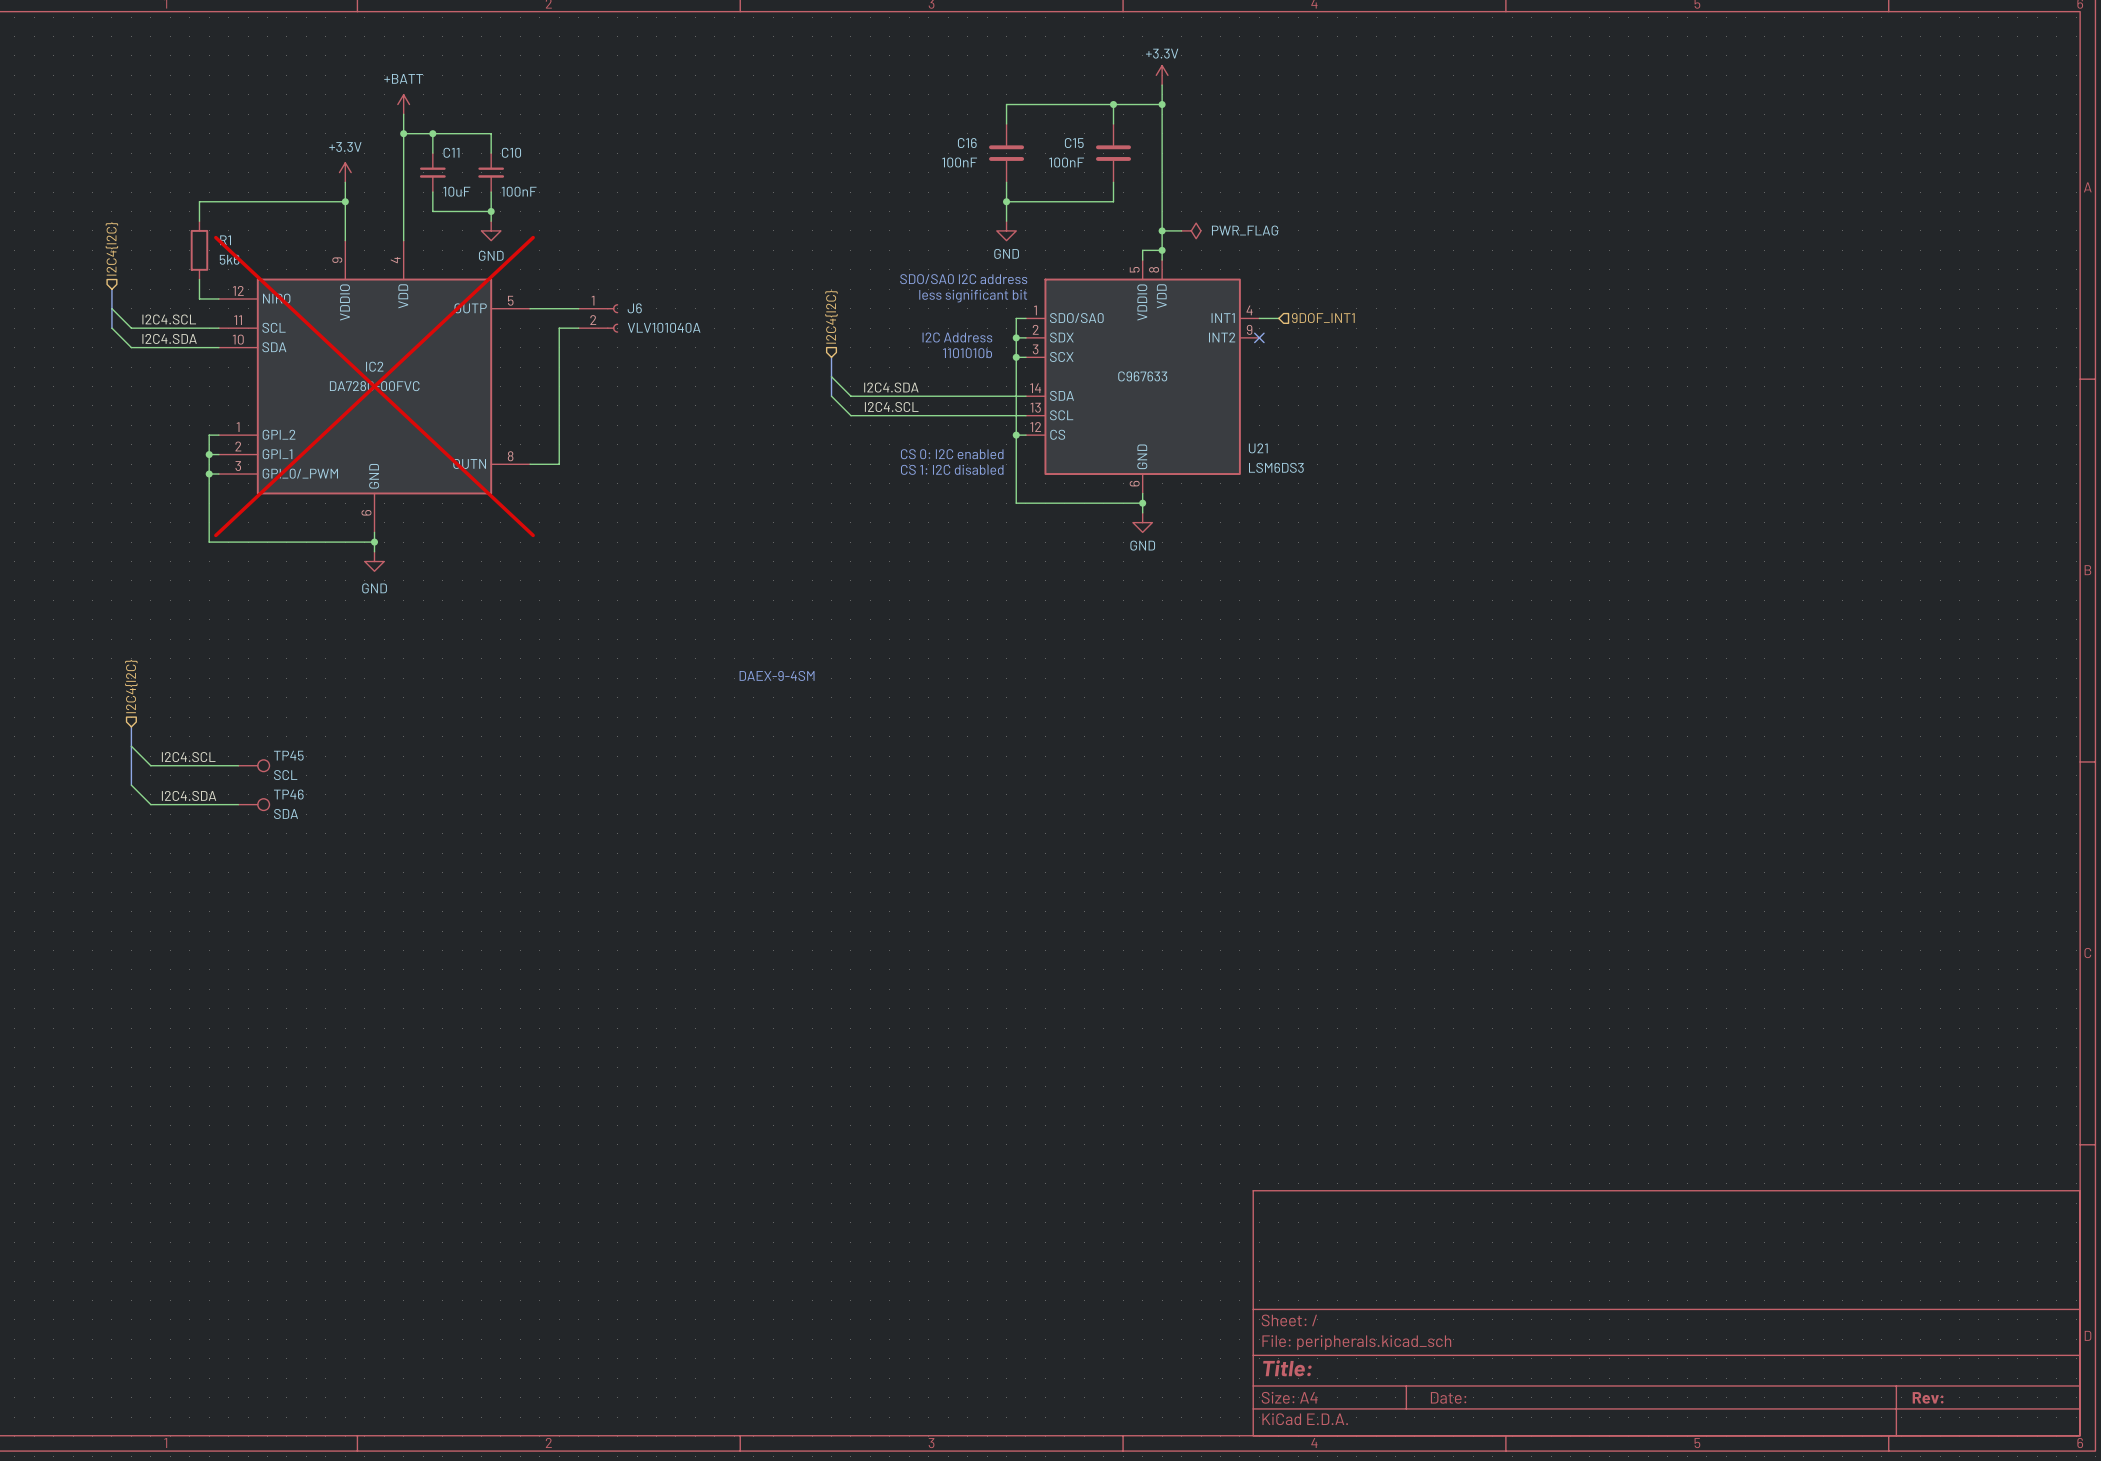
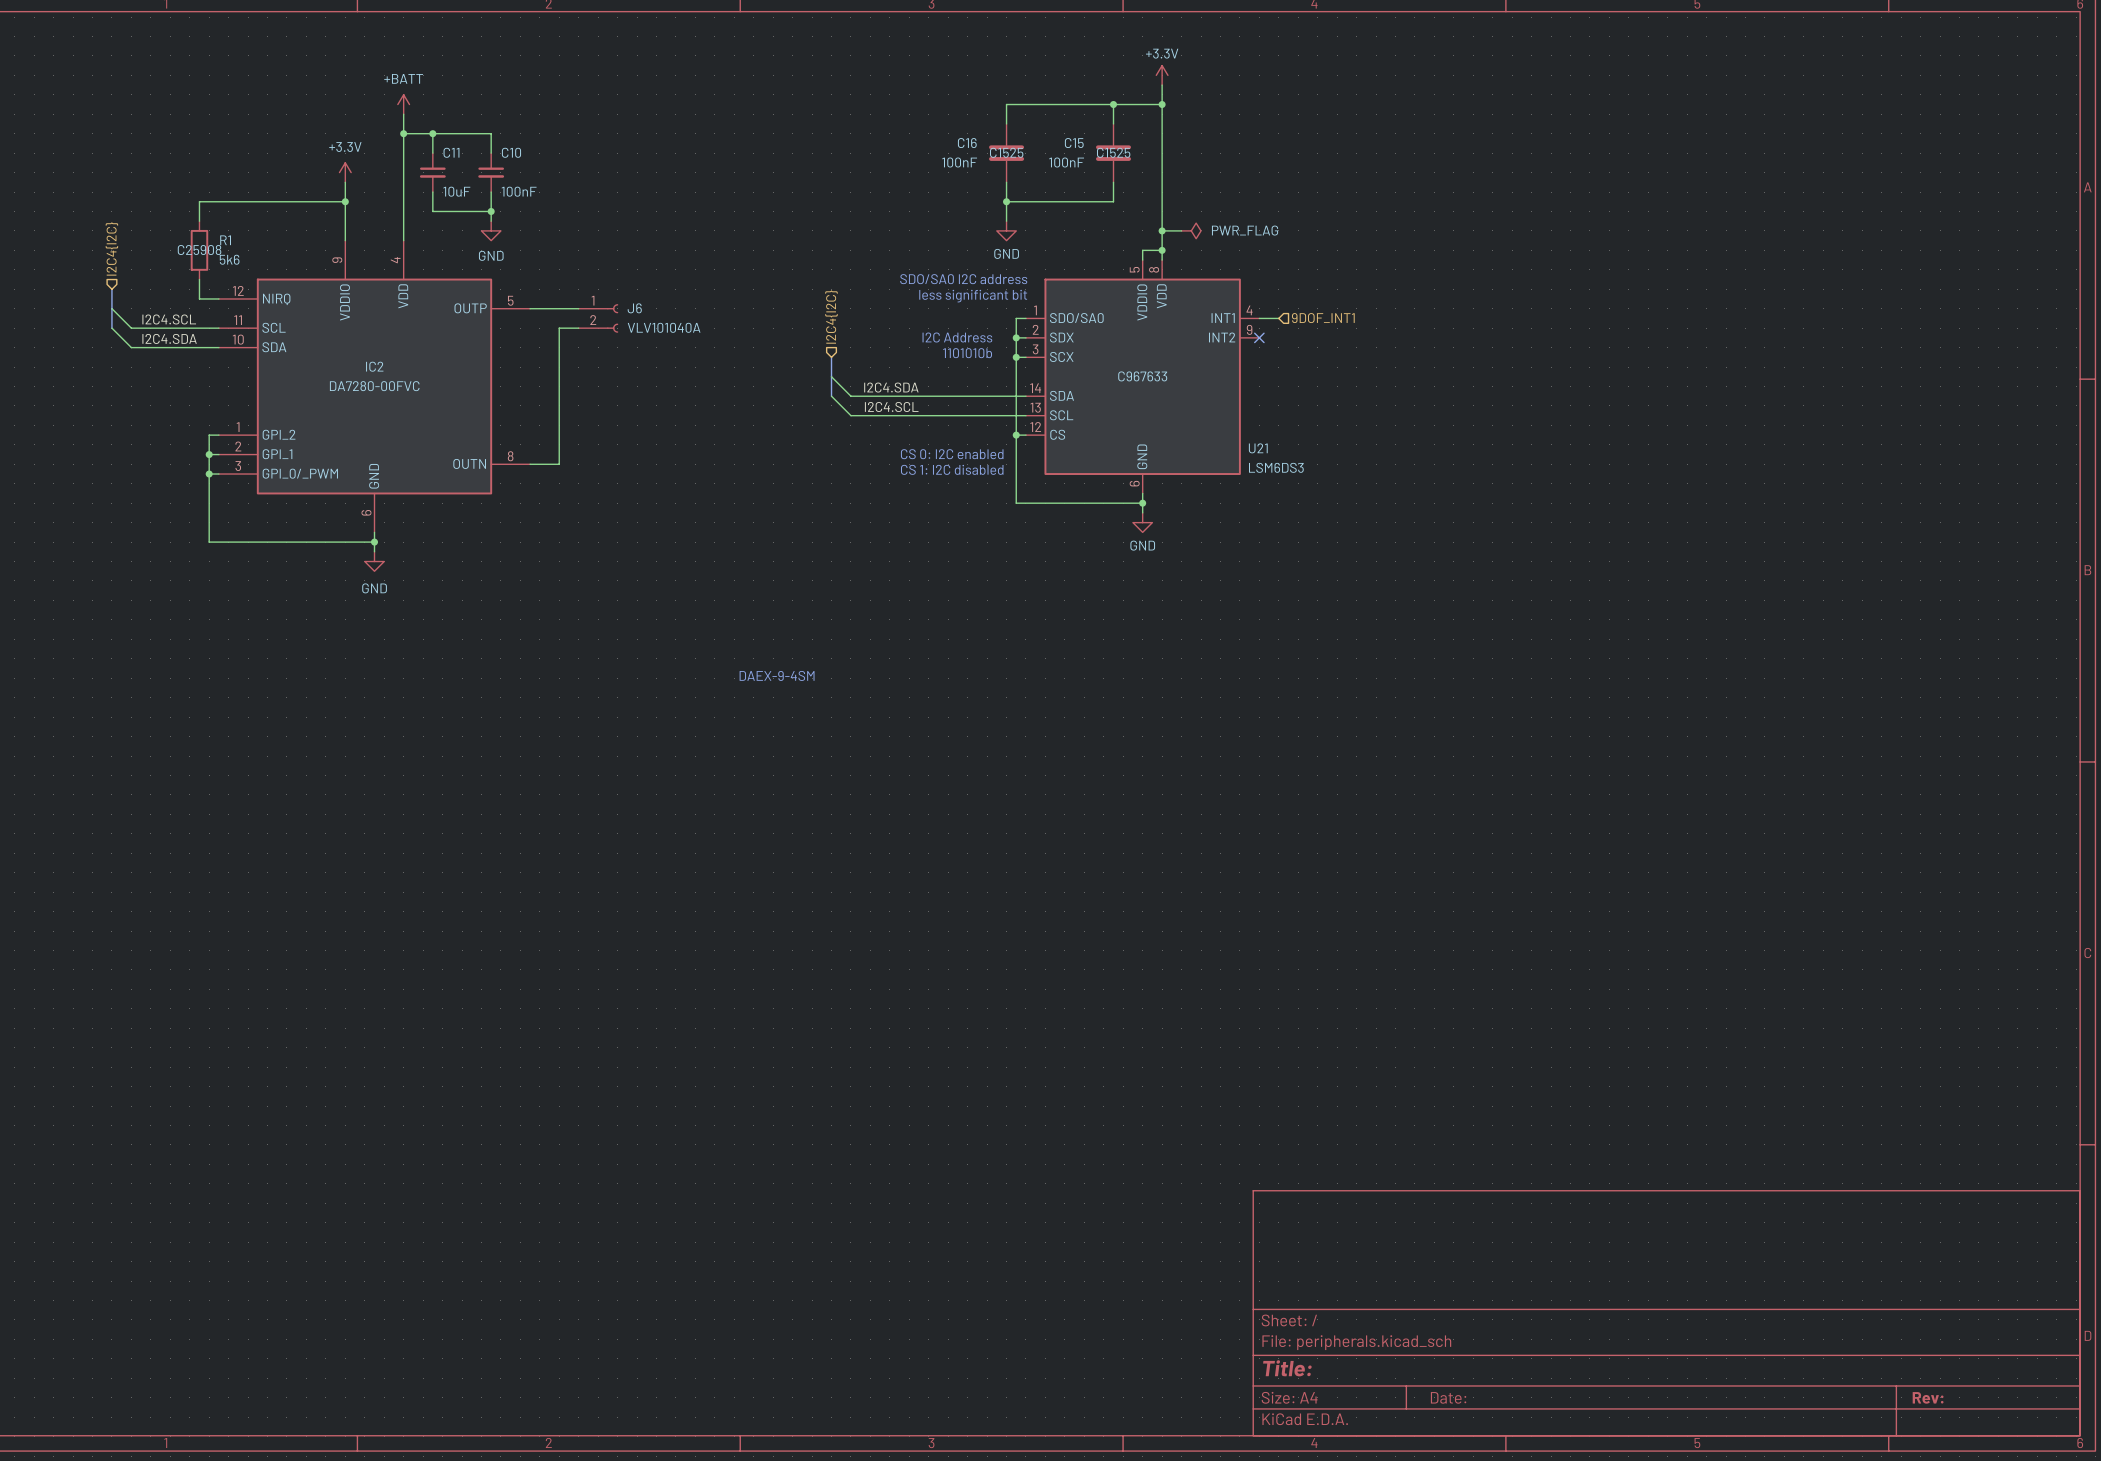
C16 text: none -> C1525 (1006, 152)
C15 text: none -> C1525 (1113, 152)
R1 text: none -> C25908 (199, 250)
IC2 do-not-place cross: (374, 386) -> none
hierarchical label: I2C4{I2C} (131, 686) -> none
bus: (131, 726) (131, 785) -> none
wire: (131, 746) (150, 765) (238, 765) -> none
label: I2C4.SCL (188, 757) -> none
TP45: SCL (253, 765) -> none
wire: (131, 785) (150, 804) (238, 804) -> none
label: I2C4.SDA (189, 795) -> none
TP46: SDA (253, 804) -> none

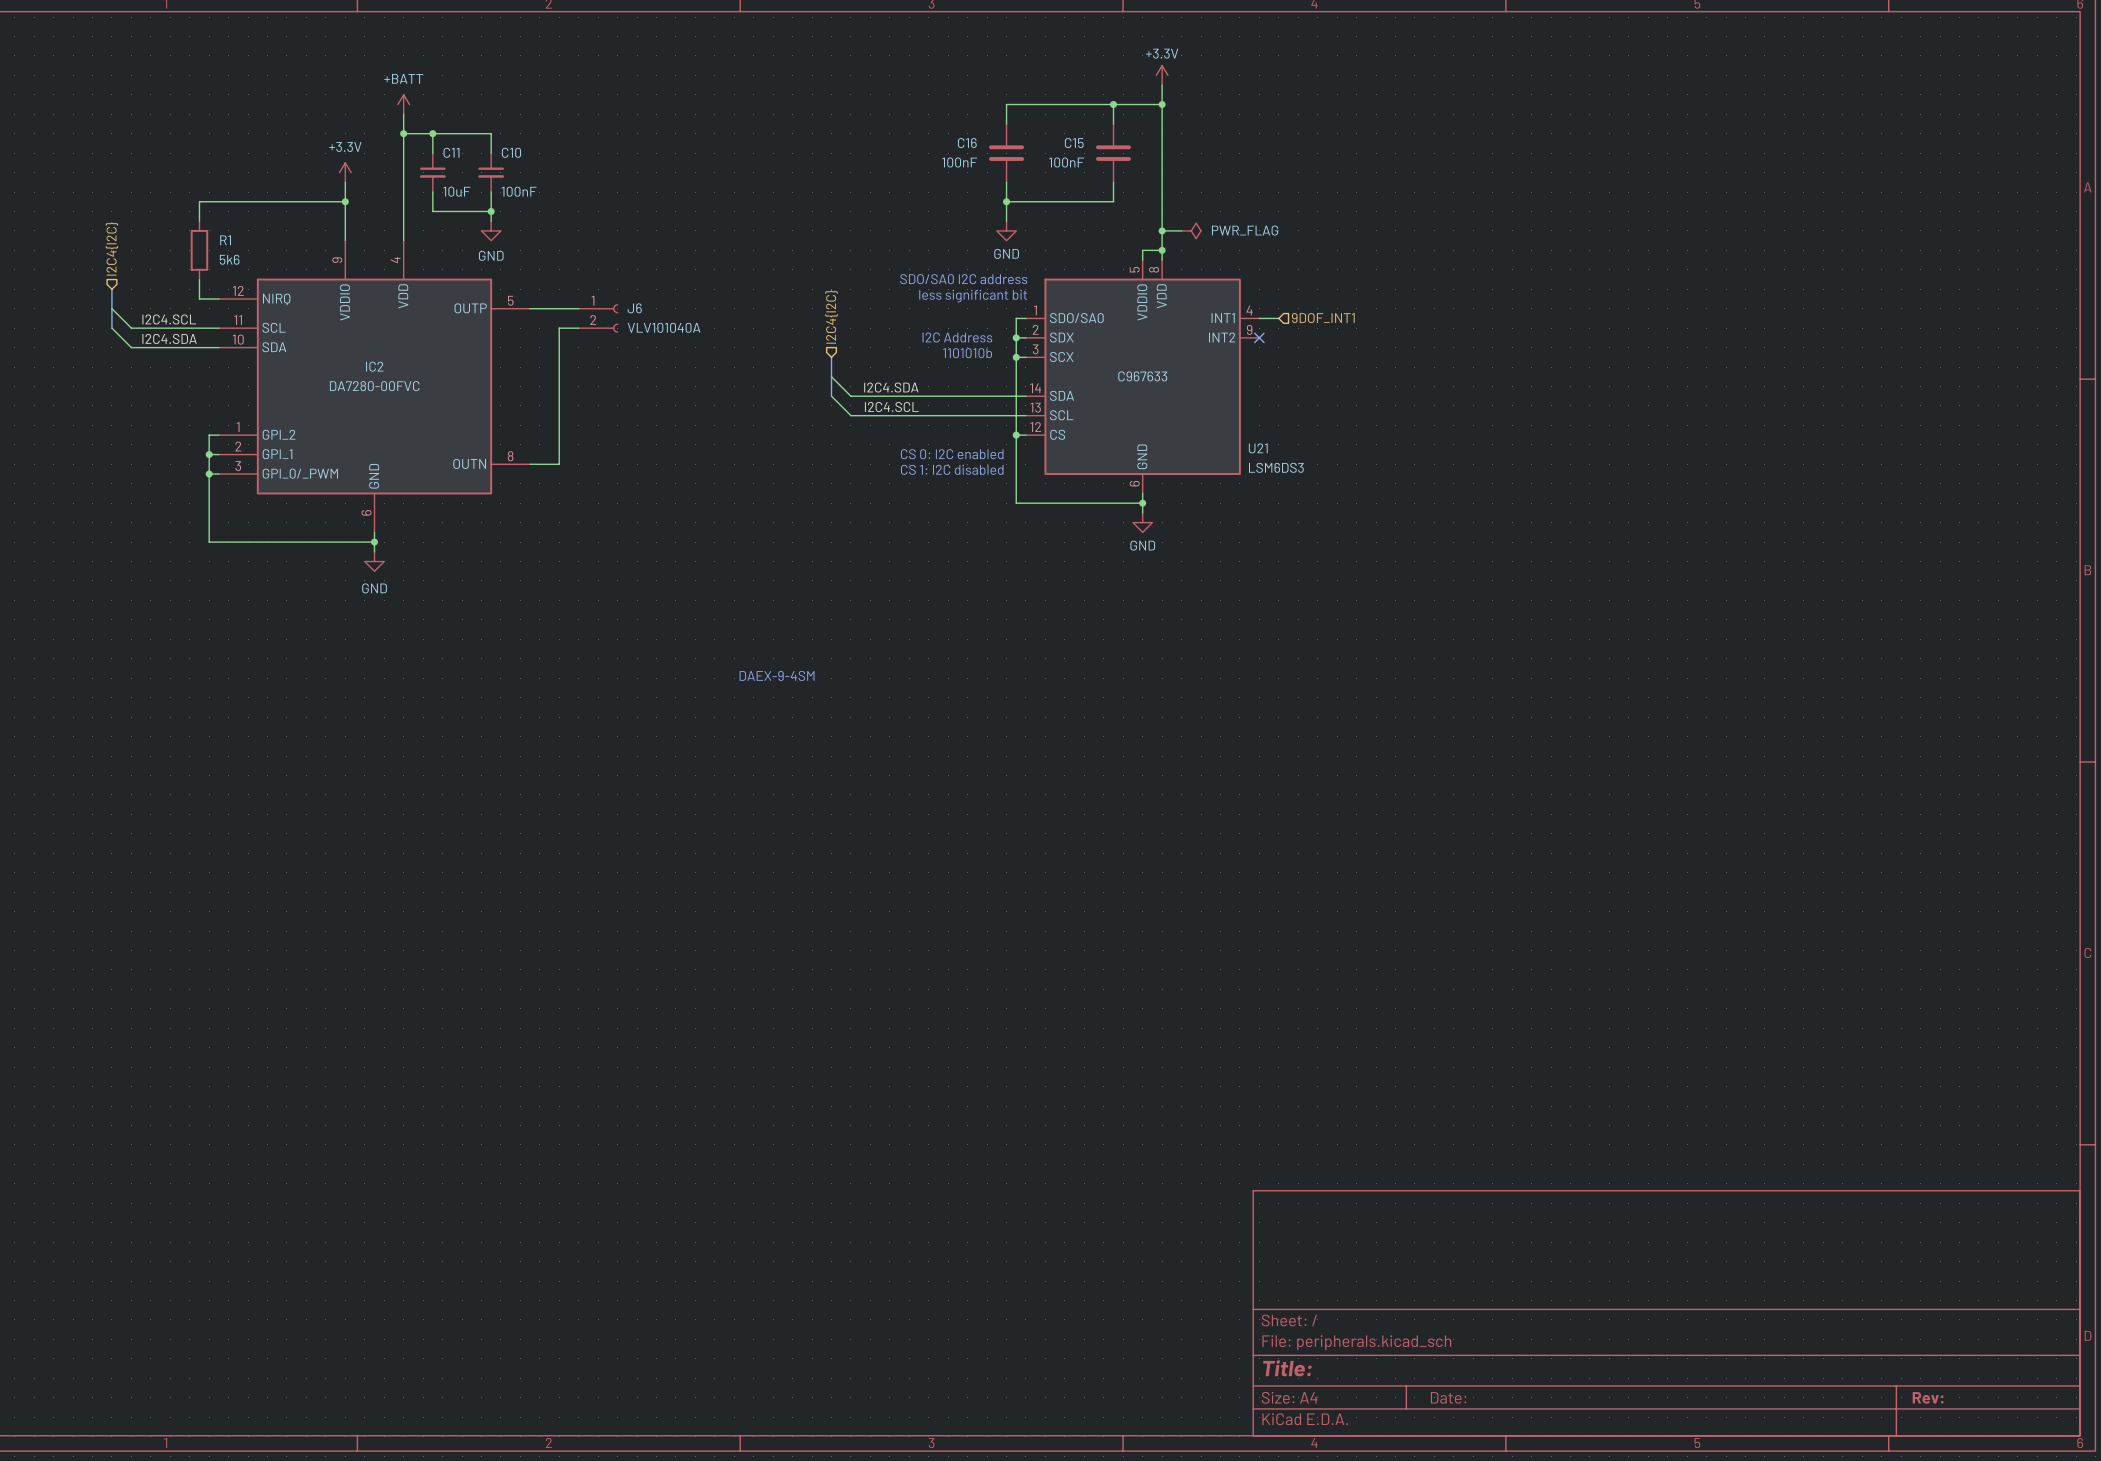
C16 text: C1525 (1006, 152) -> none
C15 text: C1525 (1113, 152) -> none
R1 text: C25908 (199, 250) -> none

